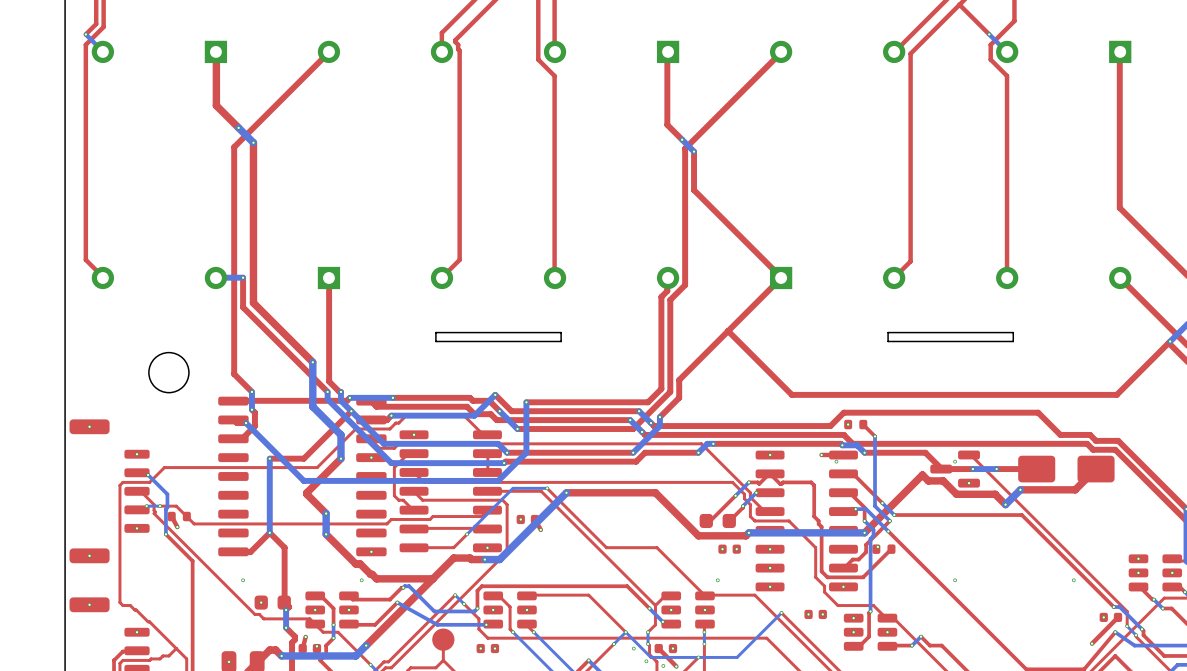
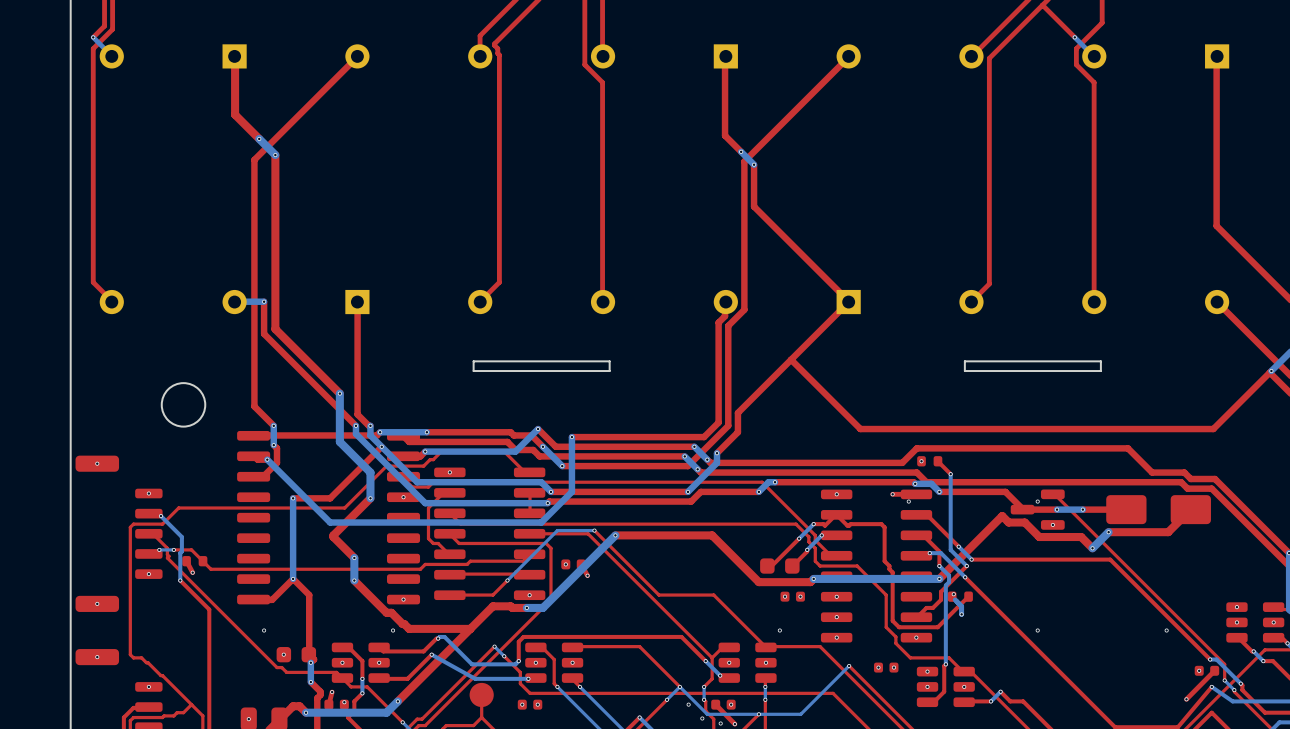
bottom track: none -> (955, 599) (961, 606) (961, 614)
via: none -> (961, 614)

